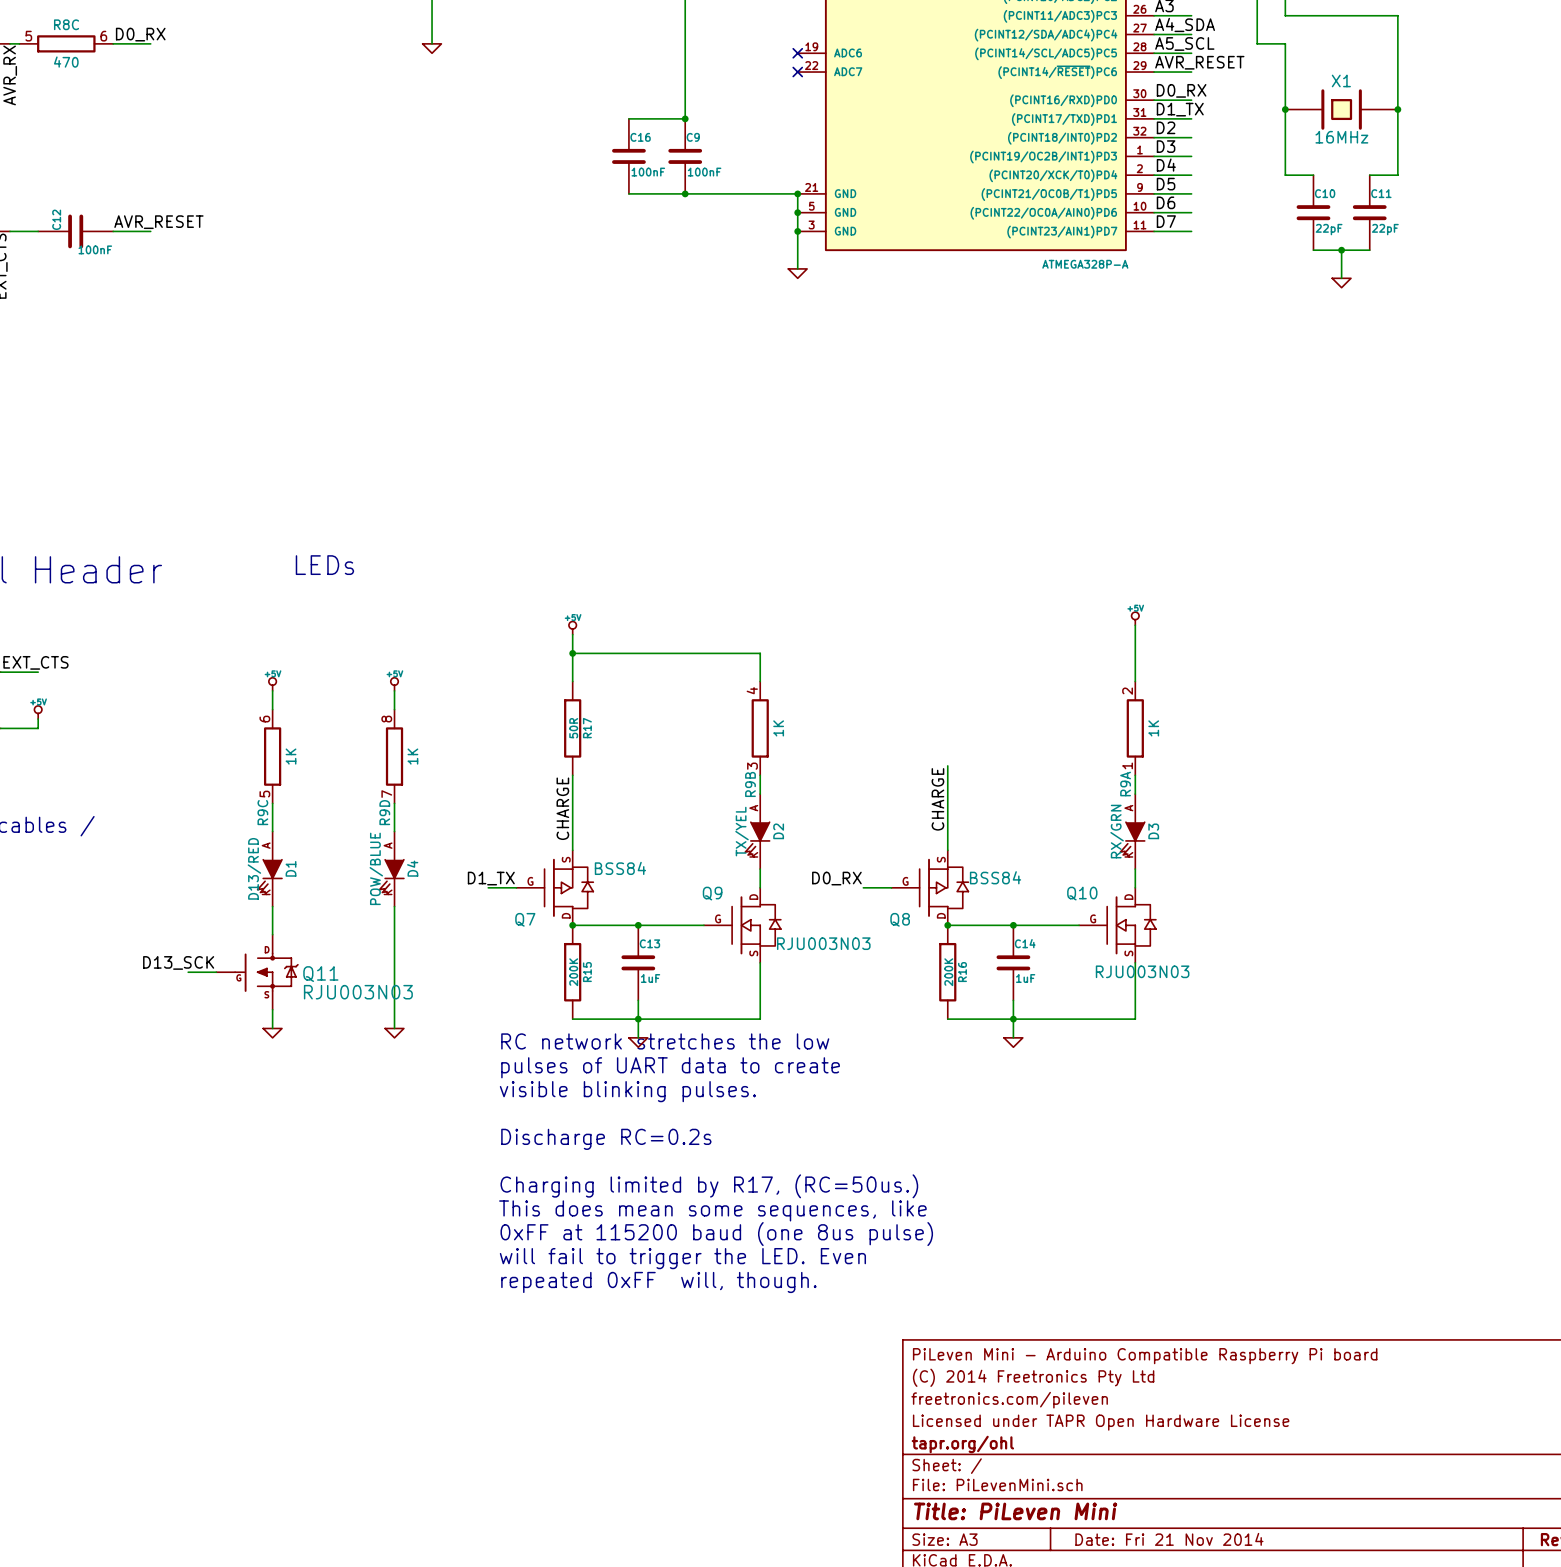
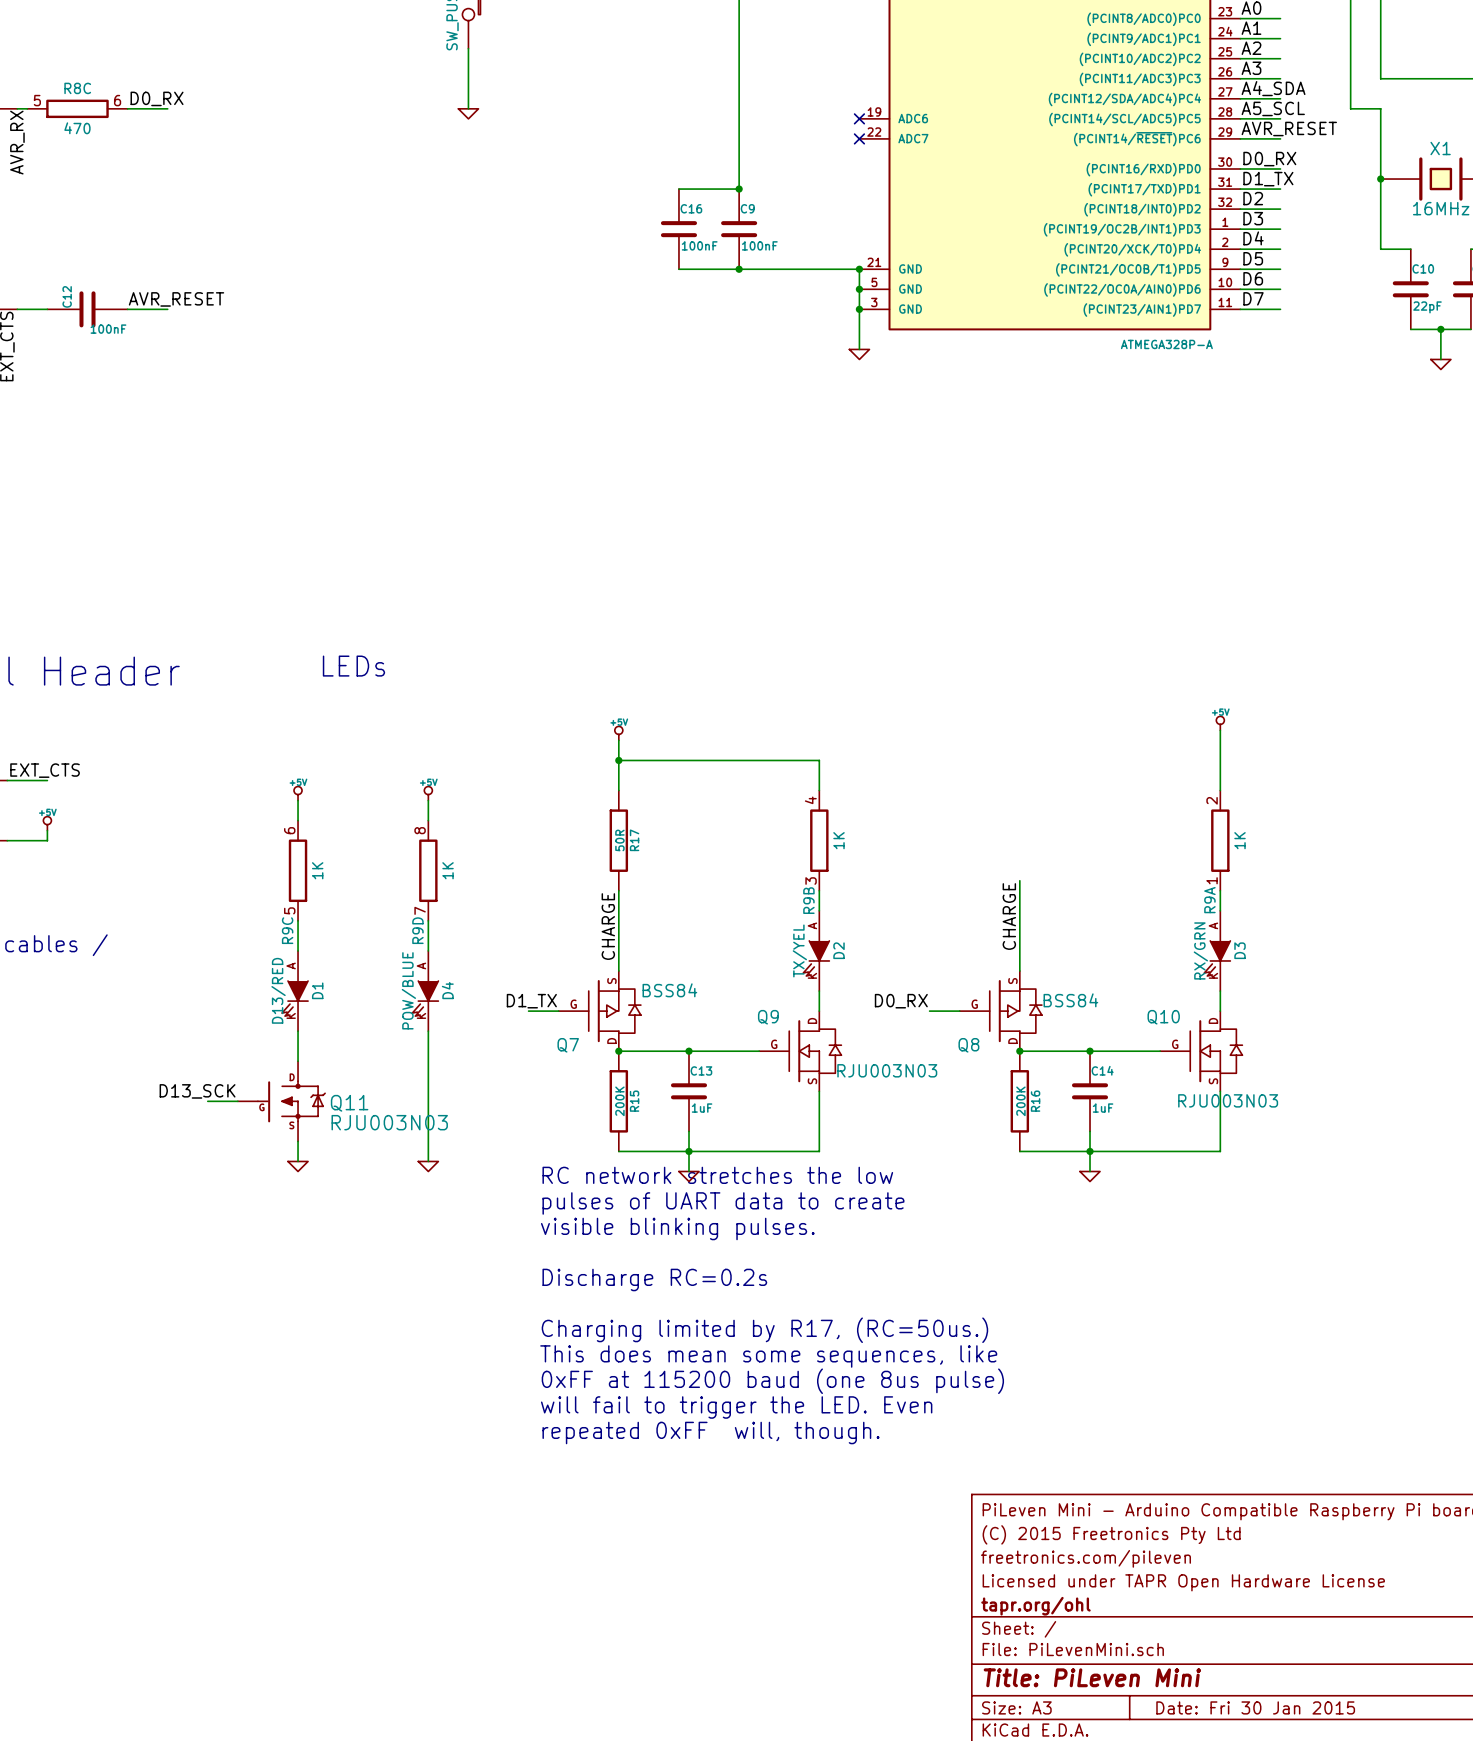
title block: (C) 2014 Freetronics Pty Ltd (1033, 1377) -> (C) 2015 Freetronics Pty Ltd (1111, 1534)
title block: Date: Fri 21 Nov 2014 (1169, 1539) -> Date: Fri 30 Jan 2015 (1255, 1707)

